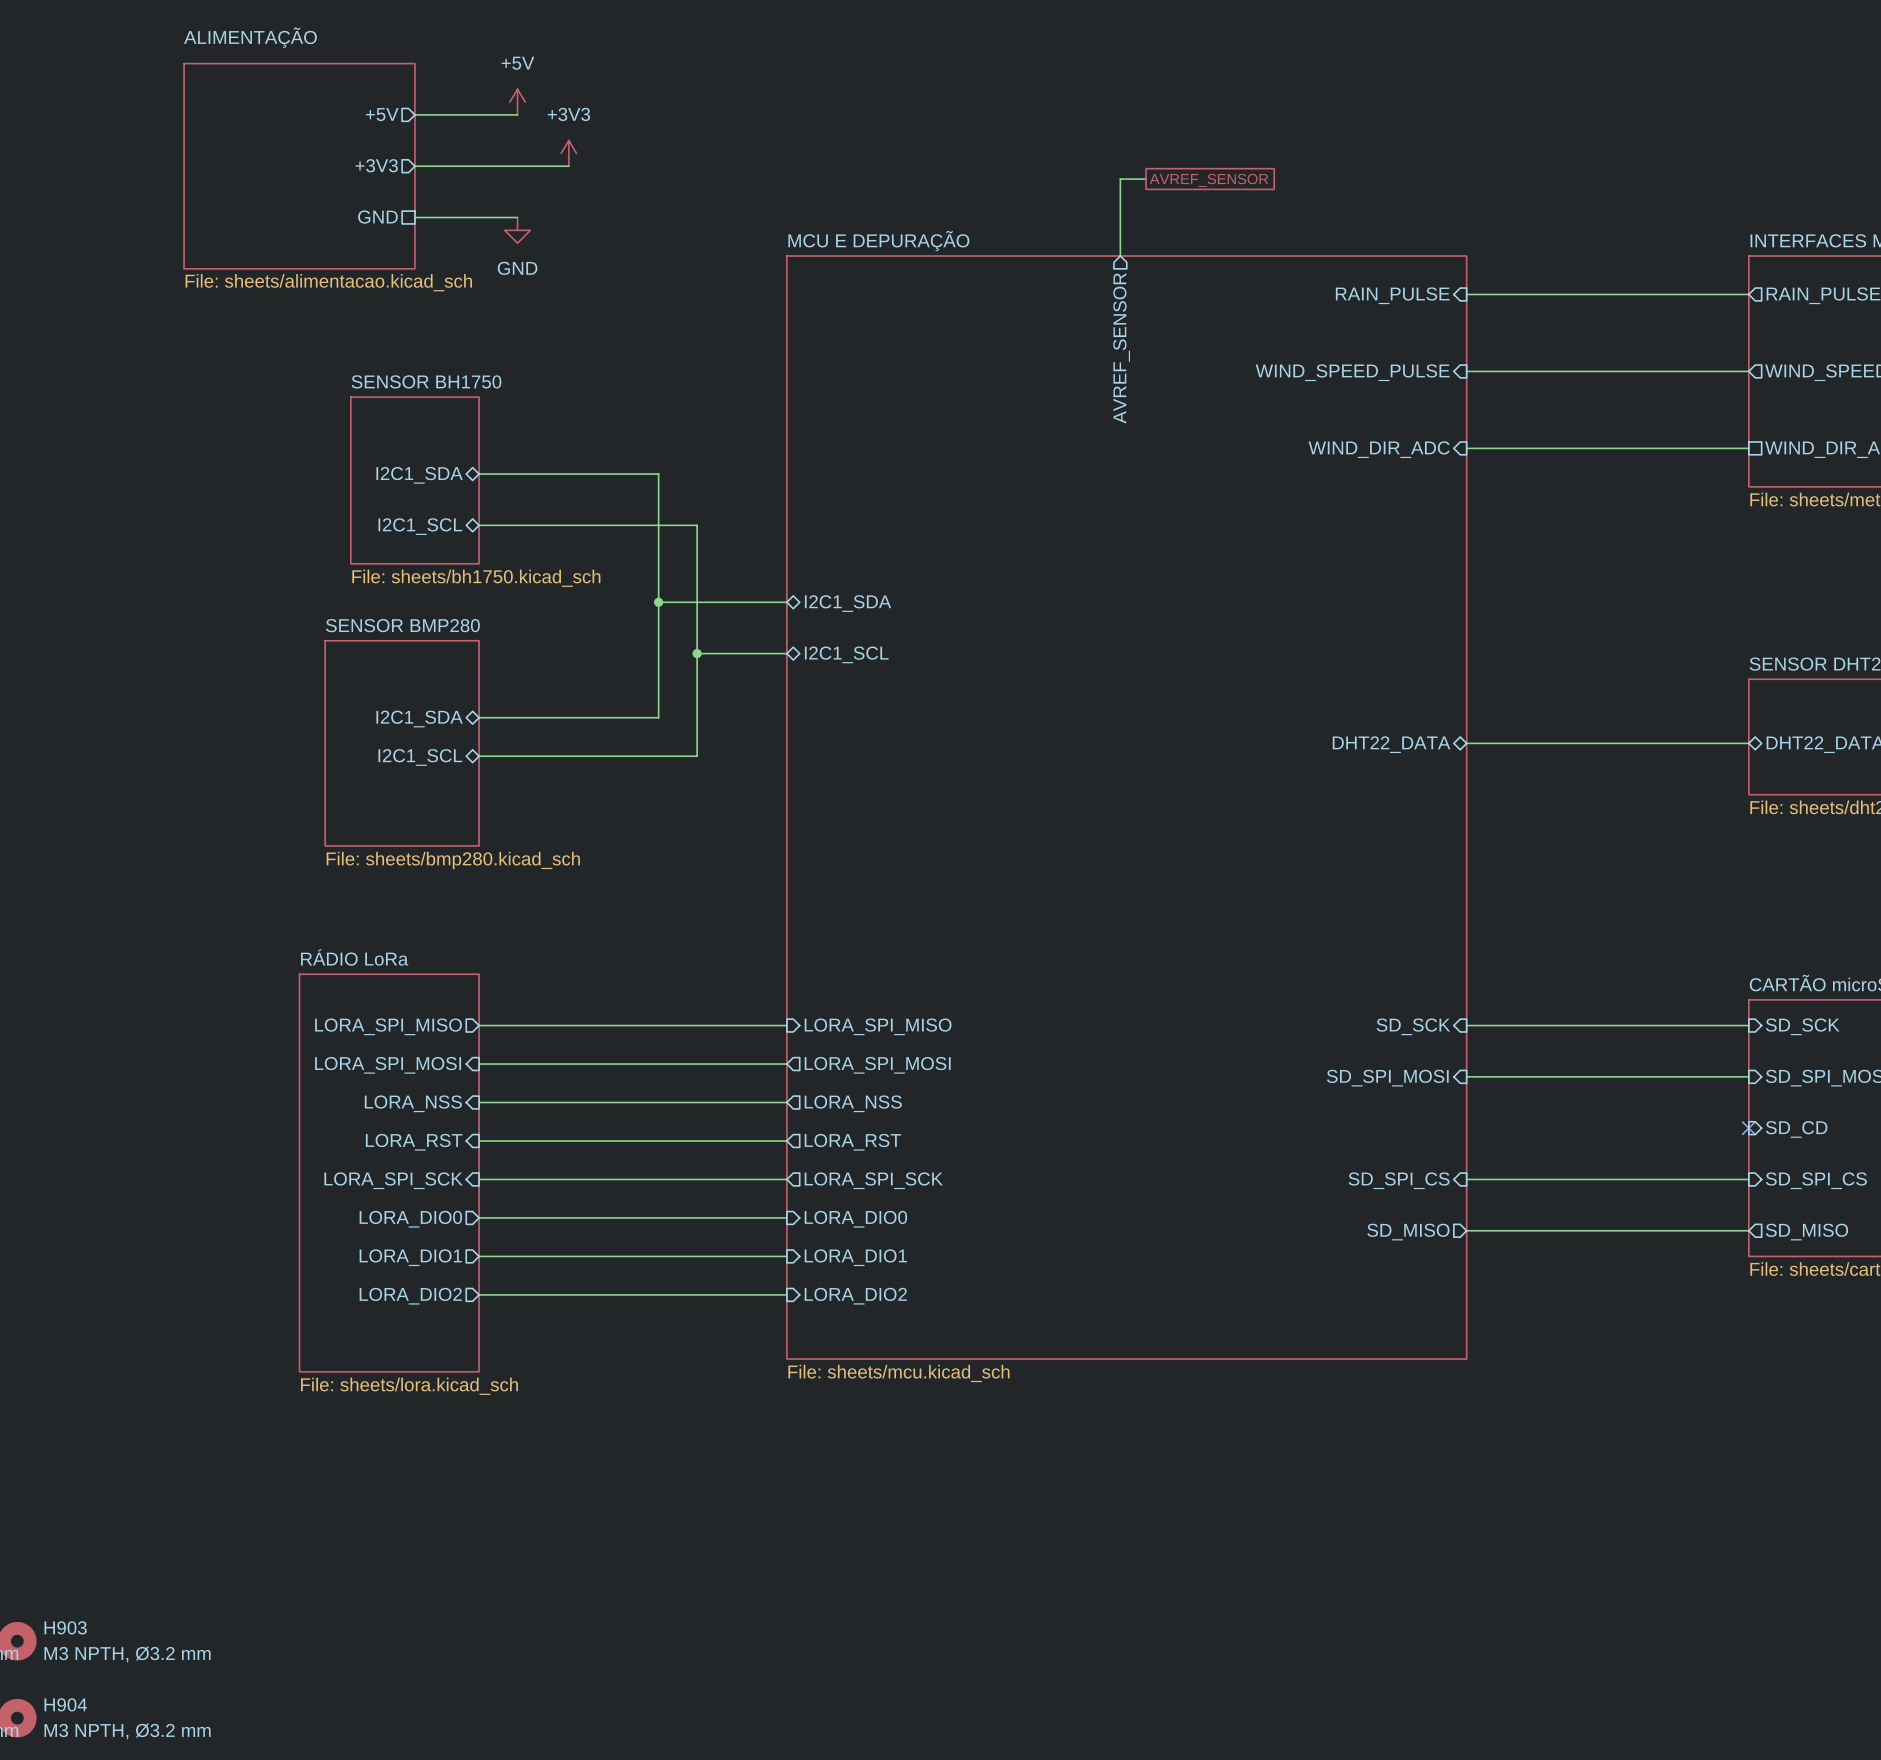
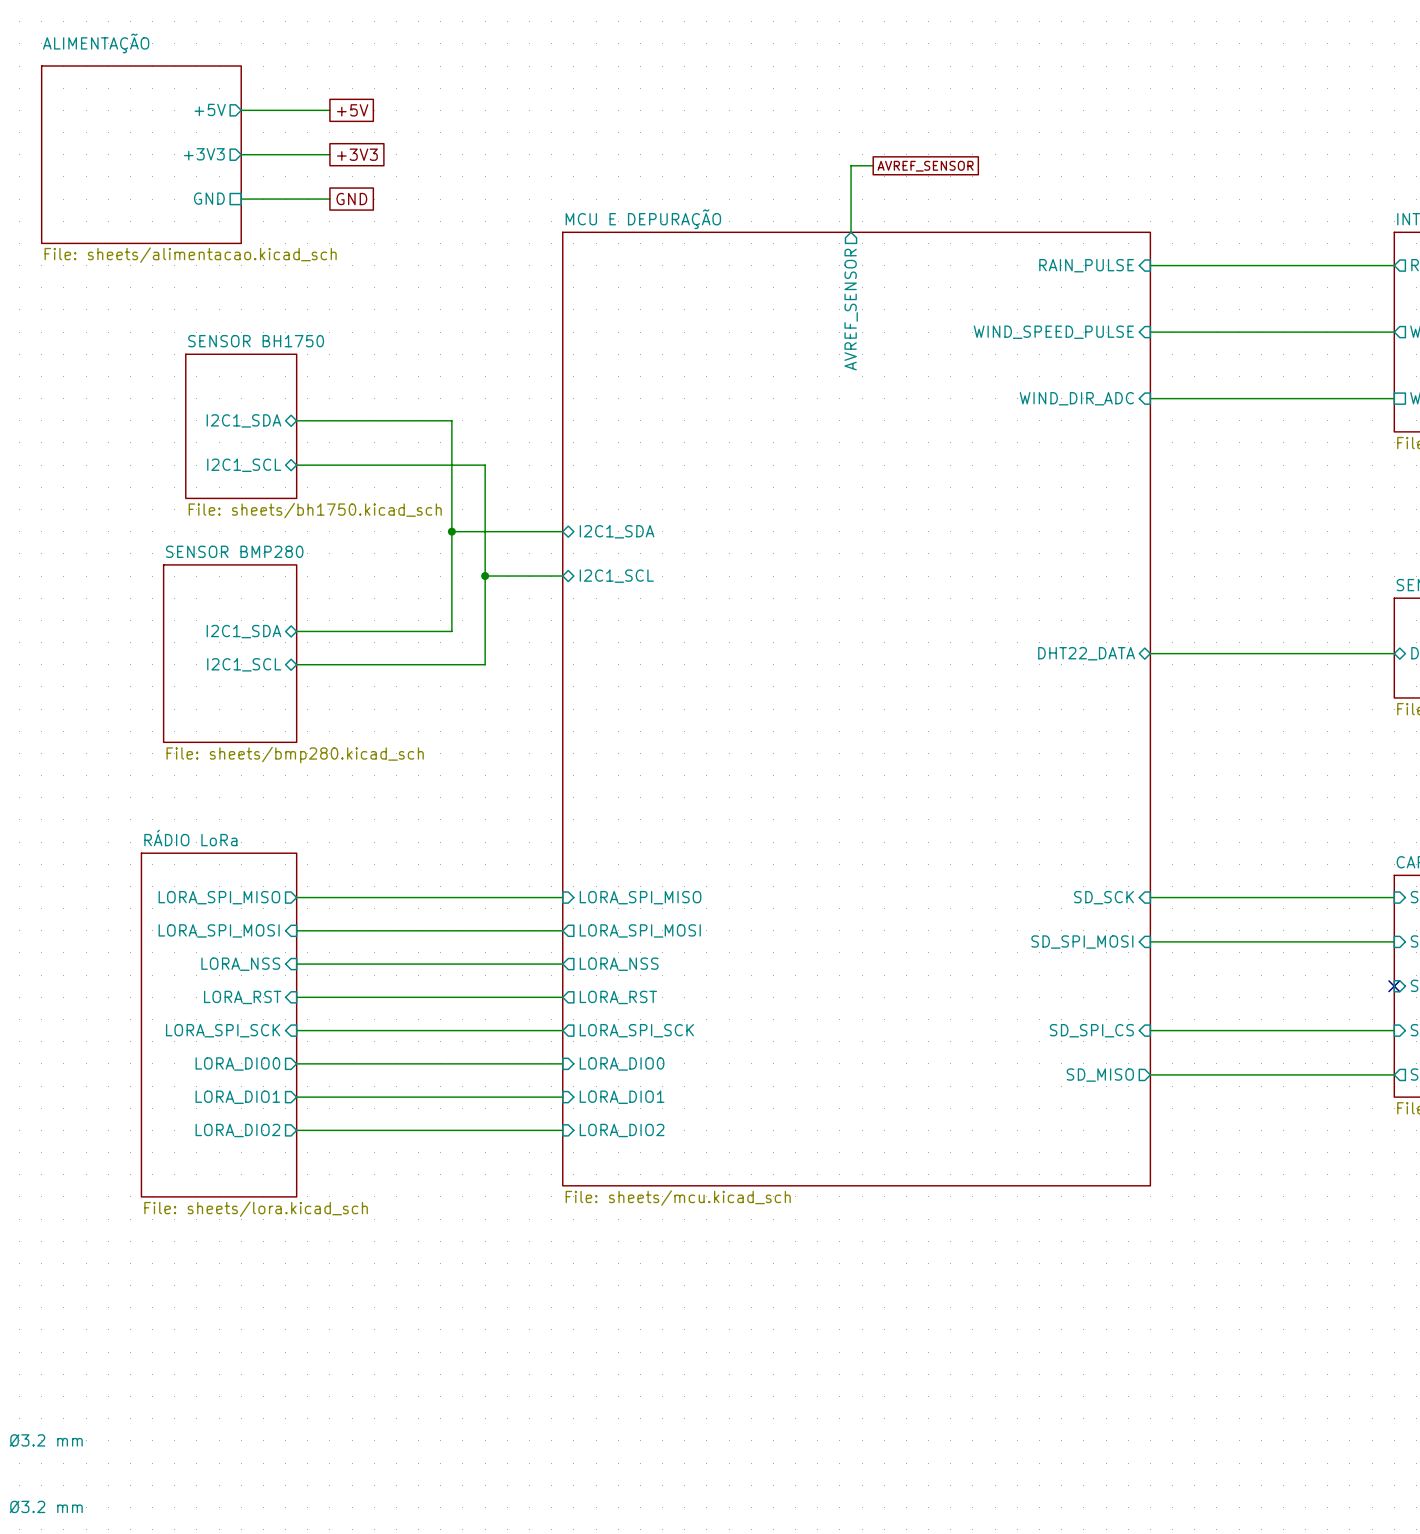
power symbol: +5V (517, 102) -> none
global label: none -> +5V (352, 110)
power symbol: +3V3 (568, 153) -> none
wire: (517, 166) (568, 166) -> none
global label: none -> +3V3 (357, 154)
global label: none -> GND (351, 199)
power symbol: GND (517, 230) -> none

